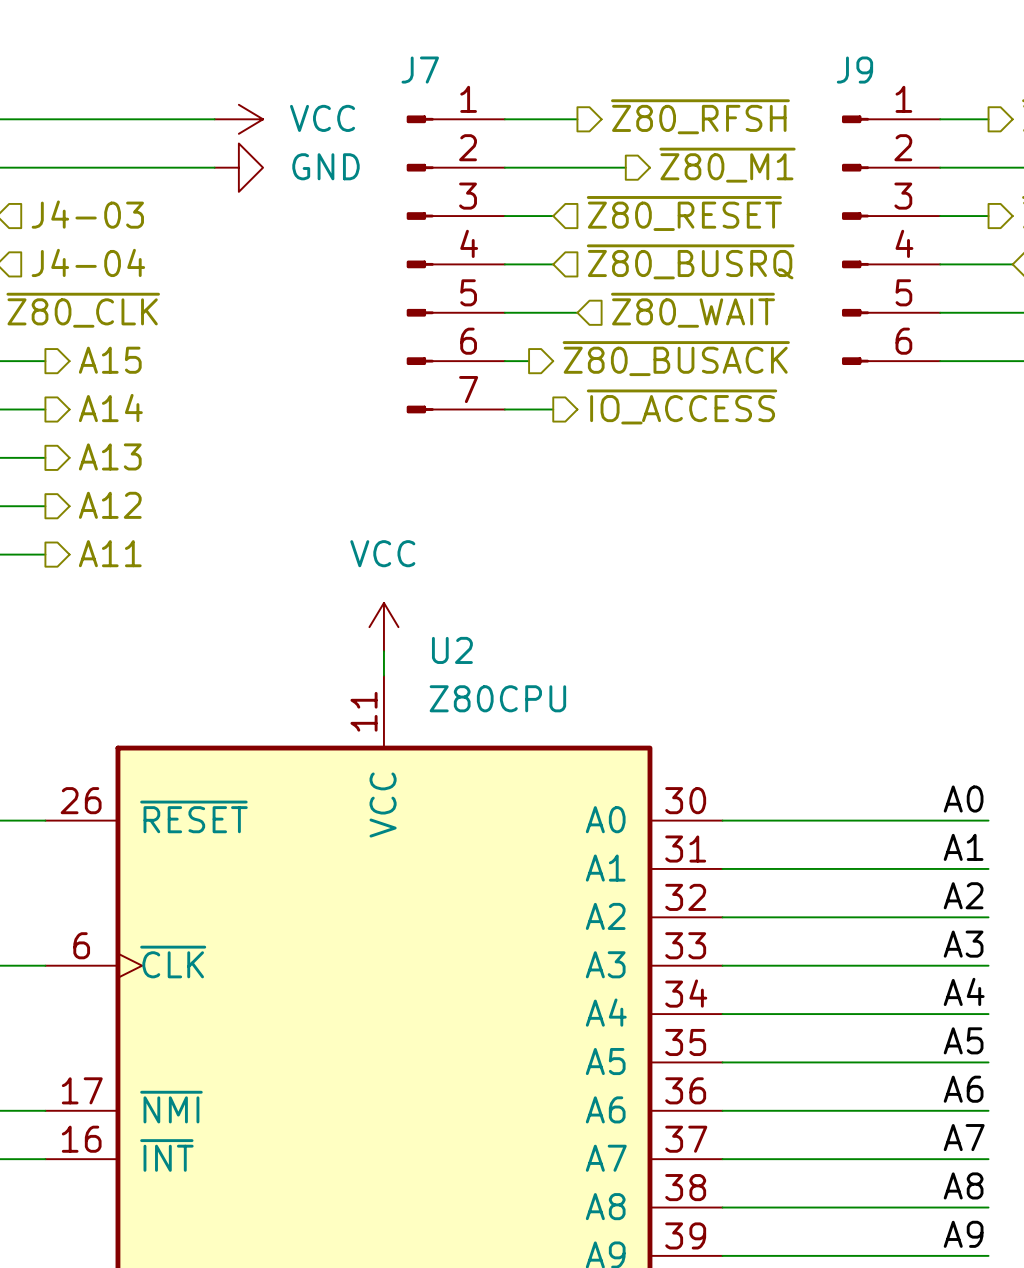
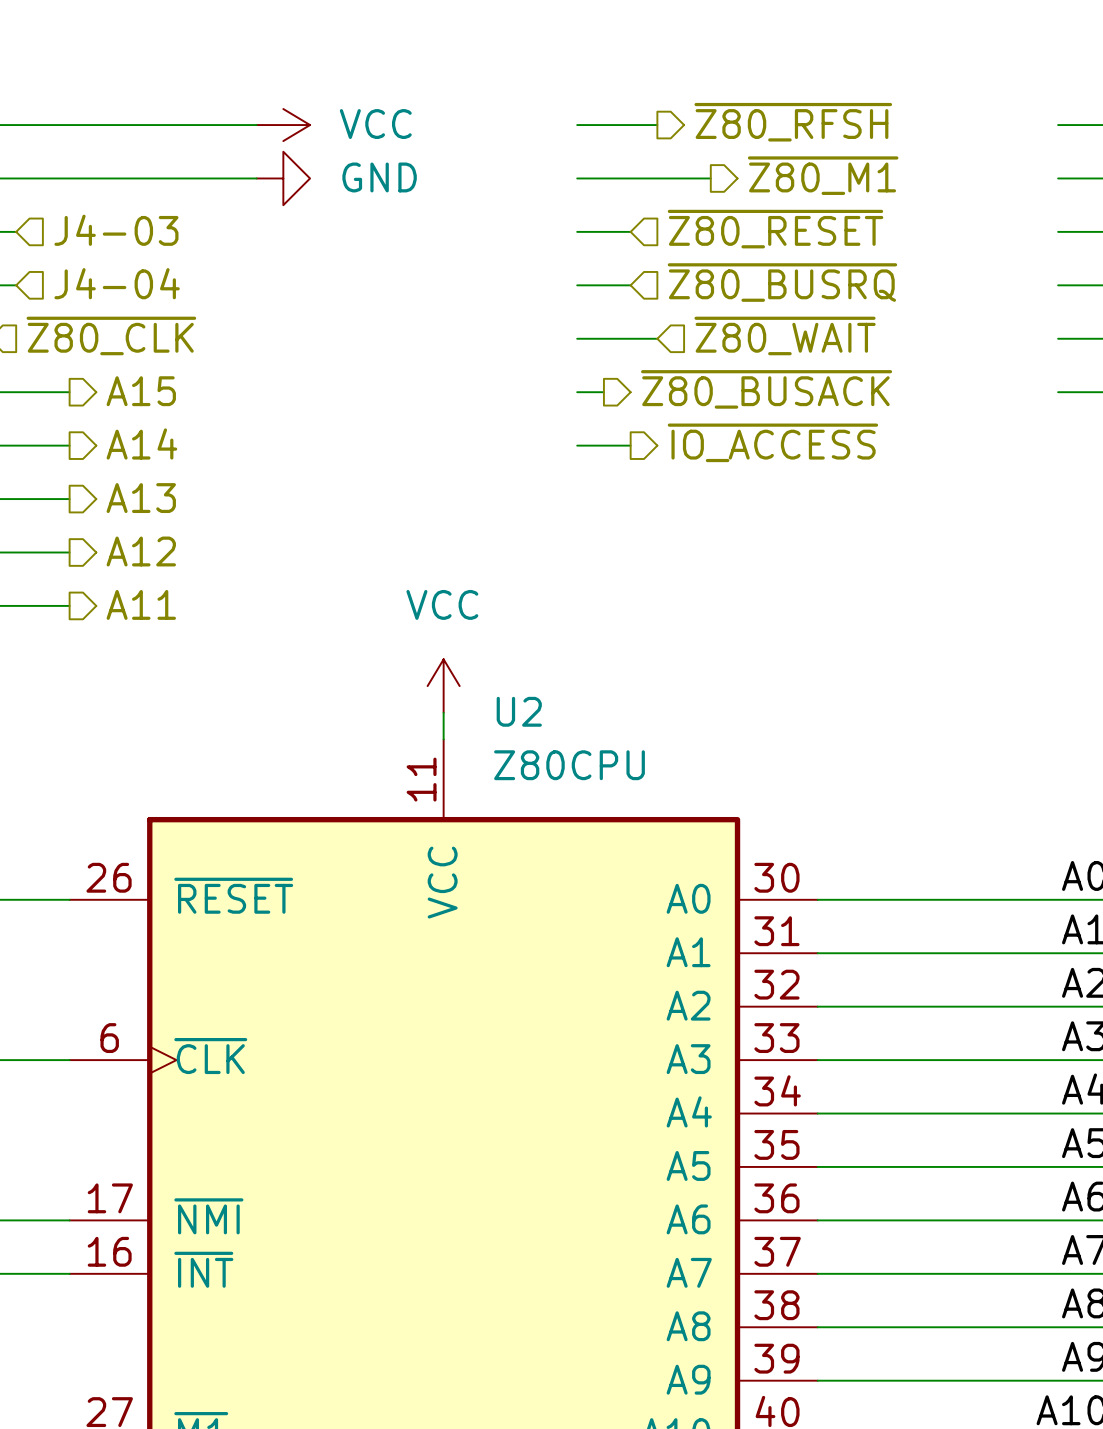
J9: (891, 240) -> none
J7: (455, 264) -> none

